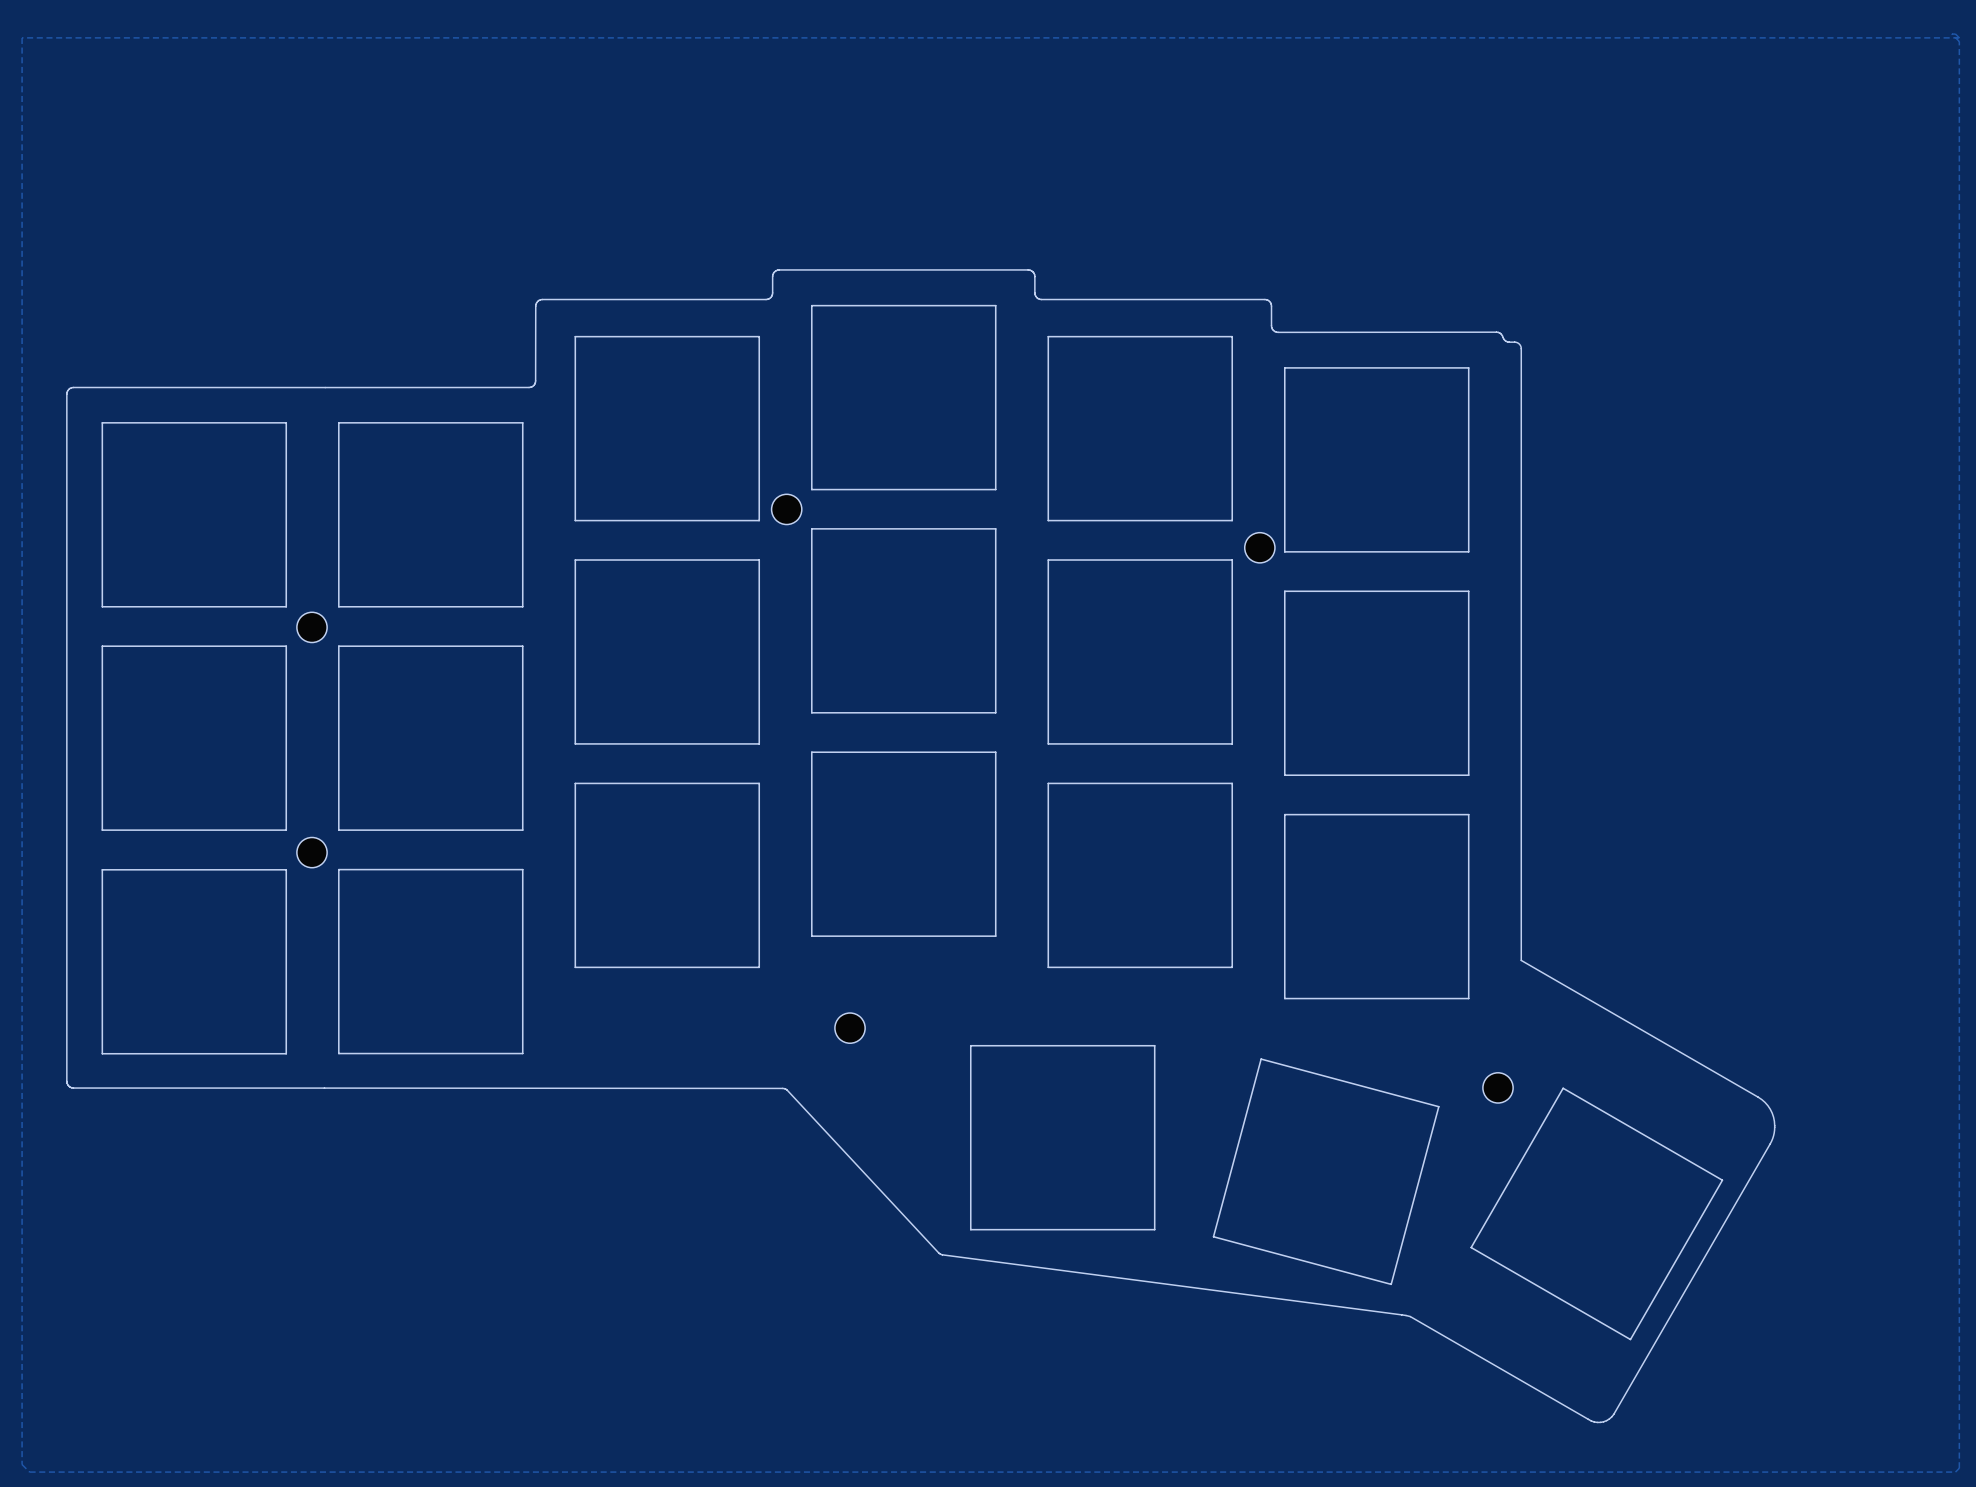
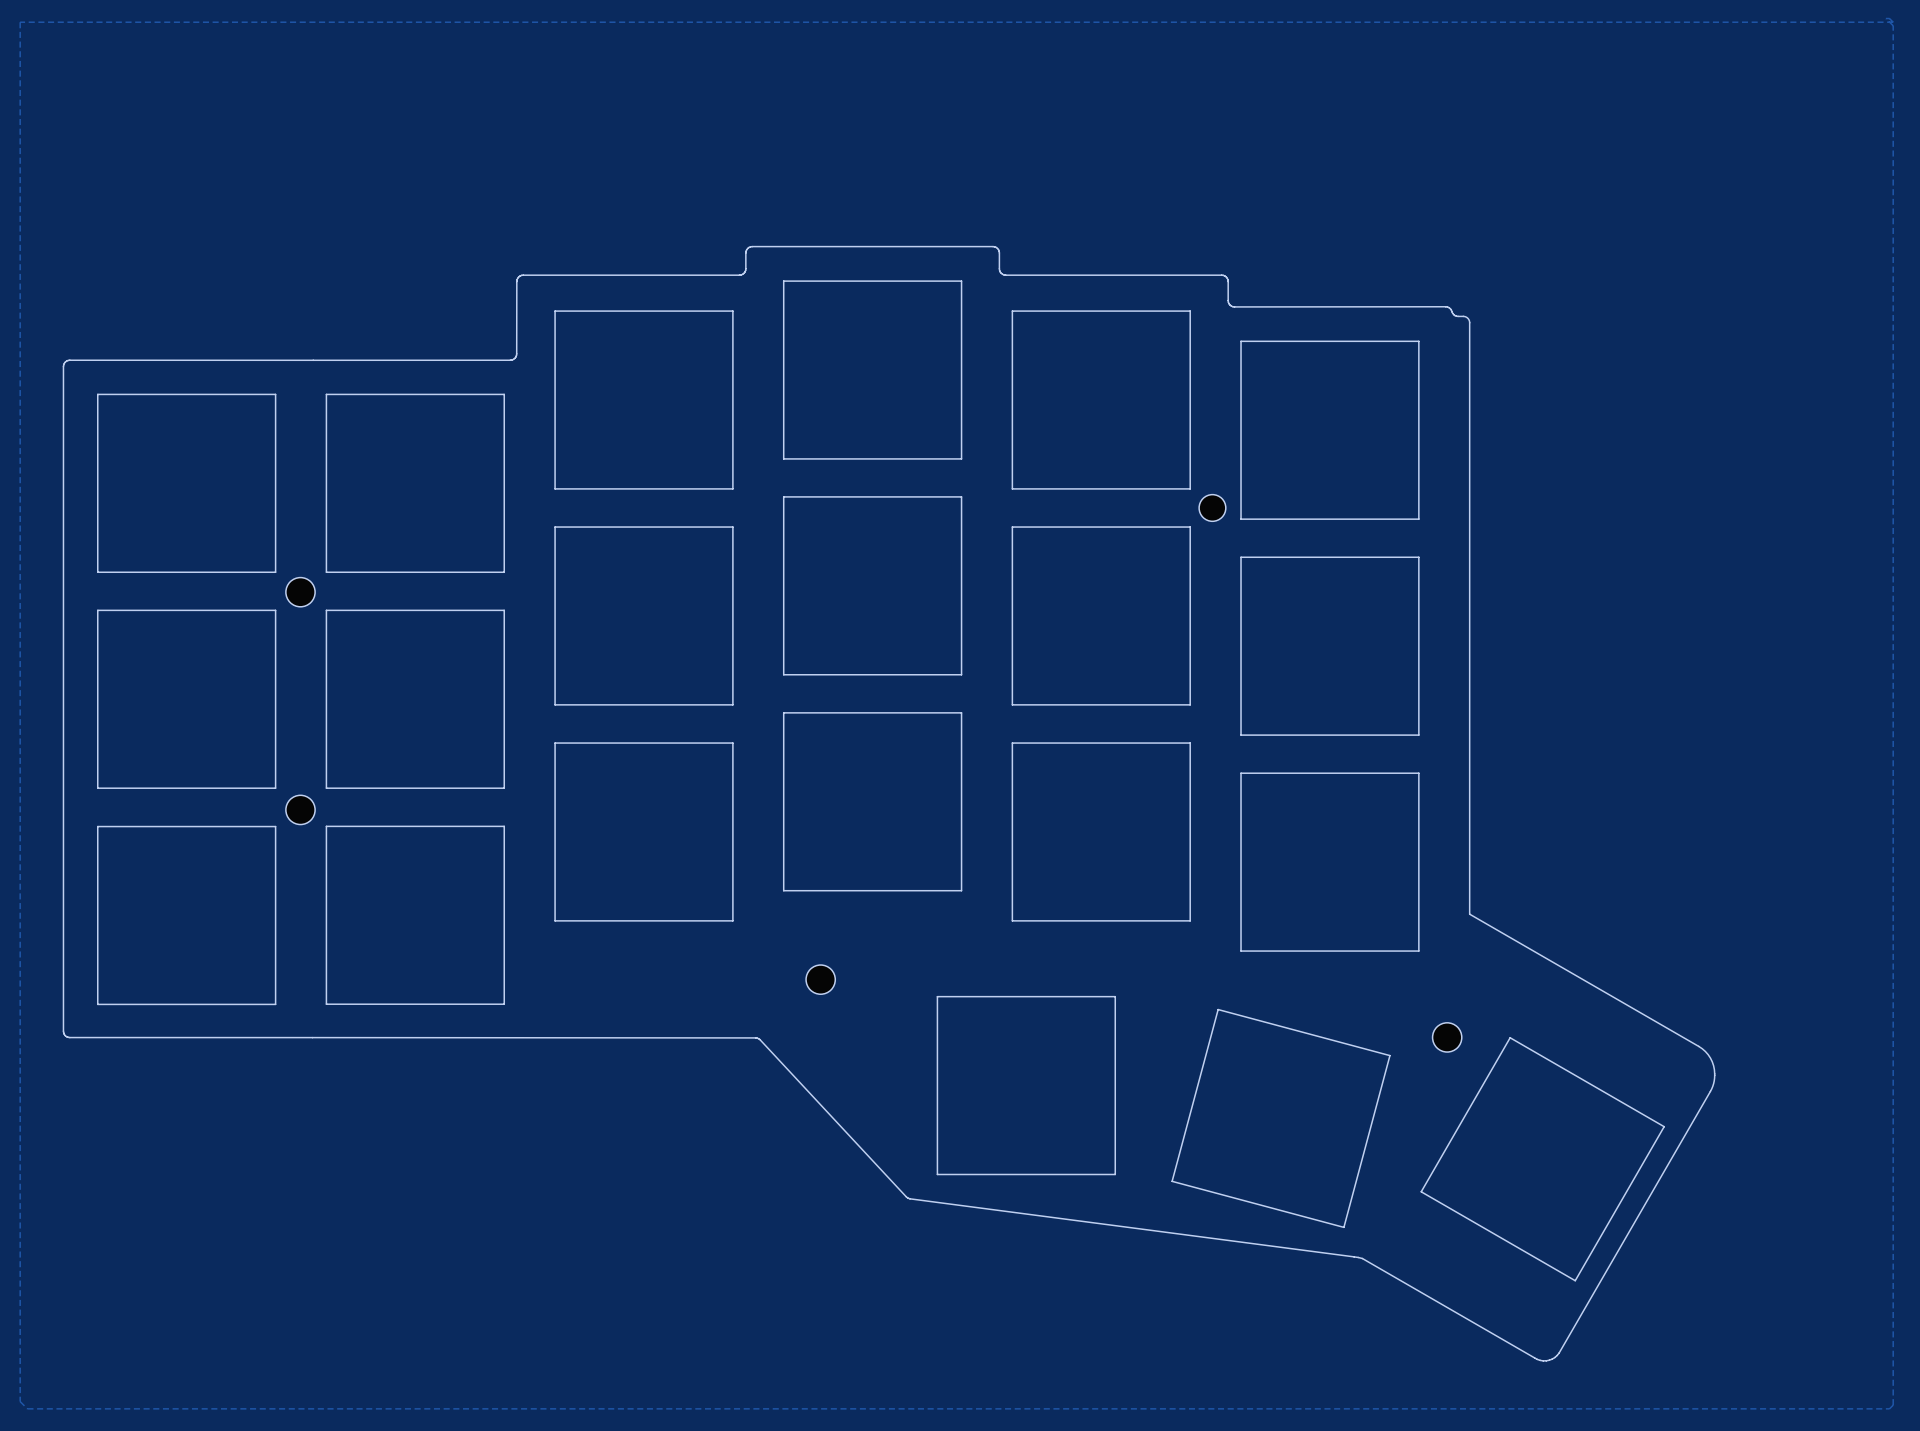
part: (786, 509) -> none
part footprint: [1244, 532, 1275, 563] -> [1199, 494, 1226, 522]

